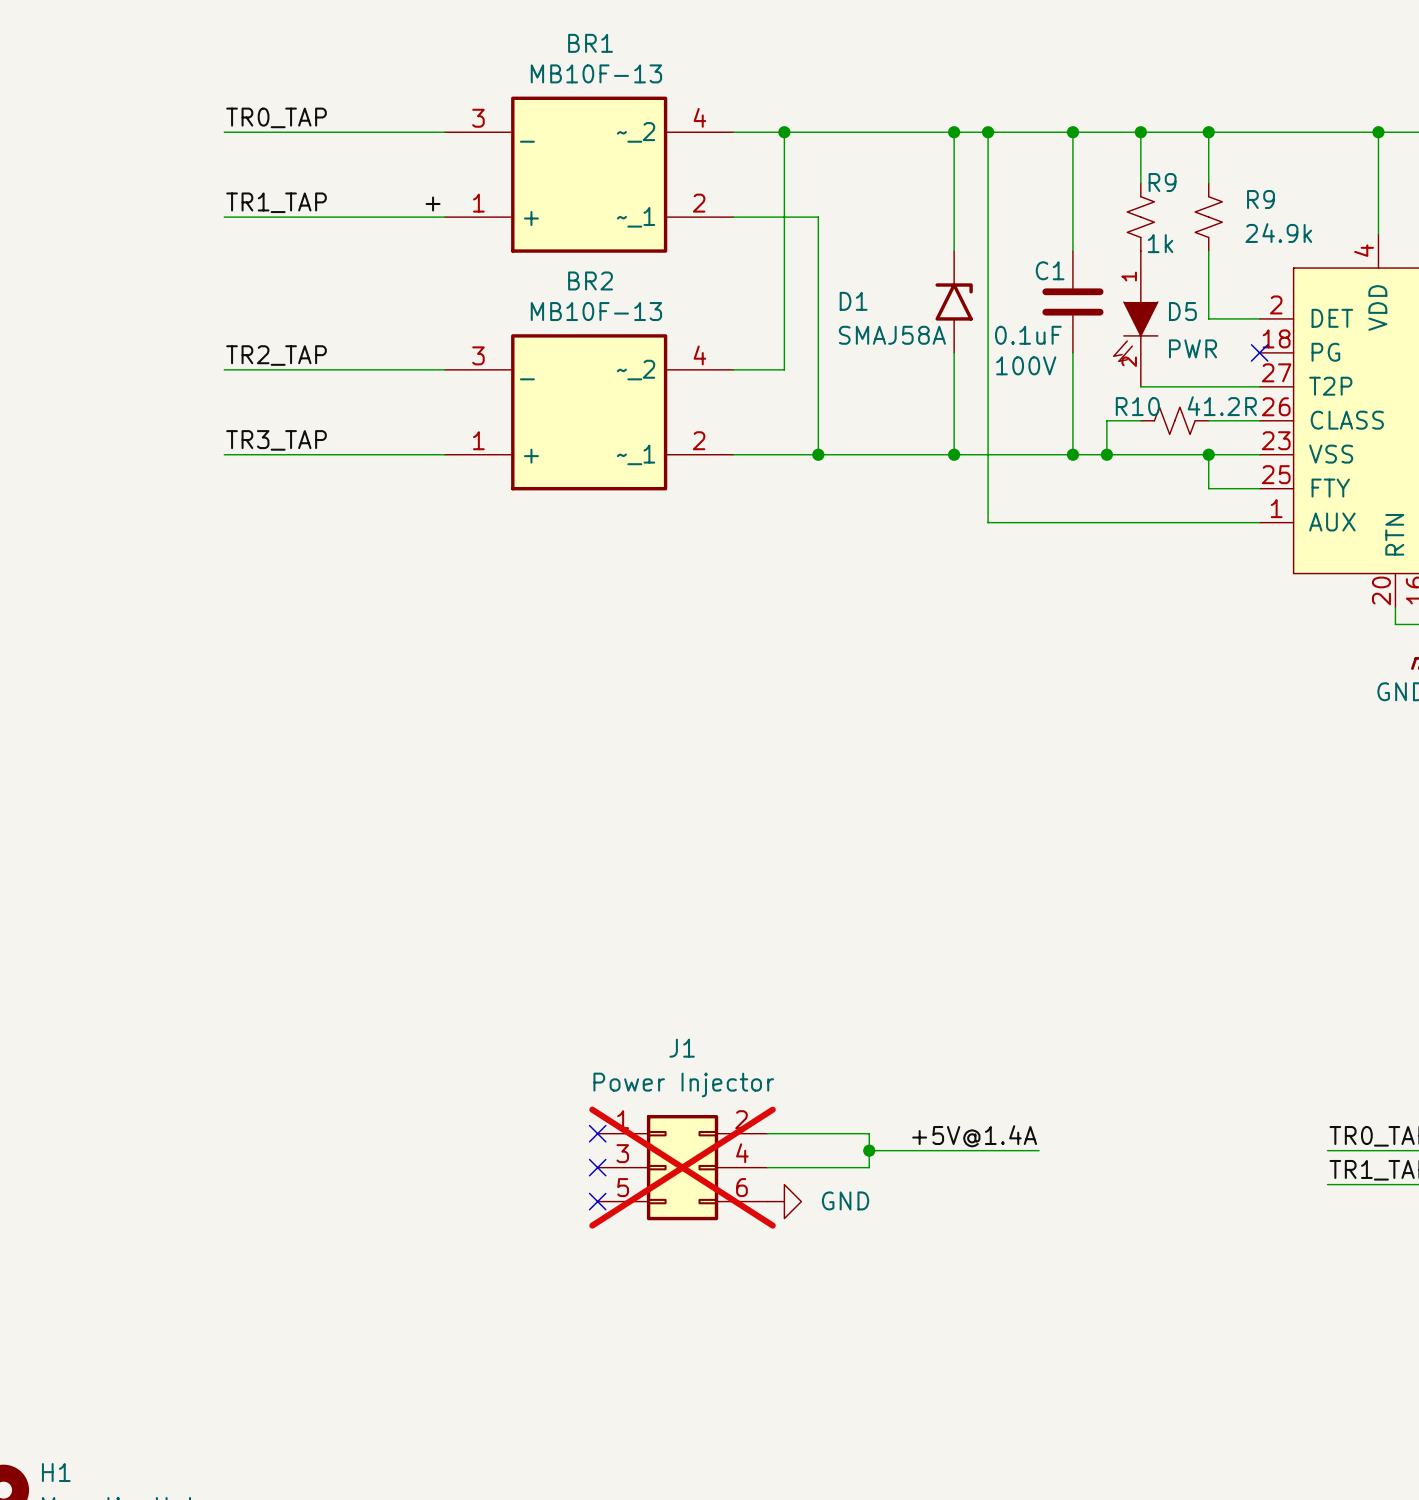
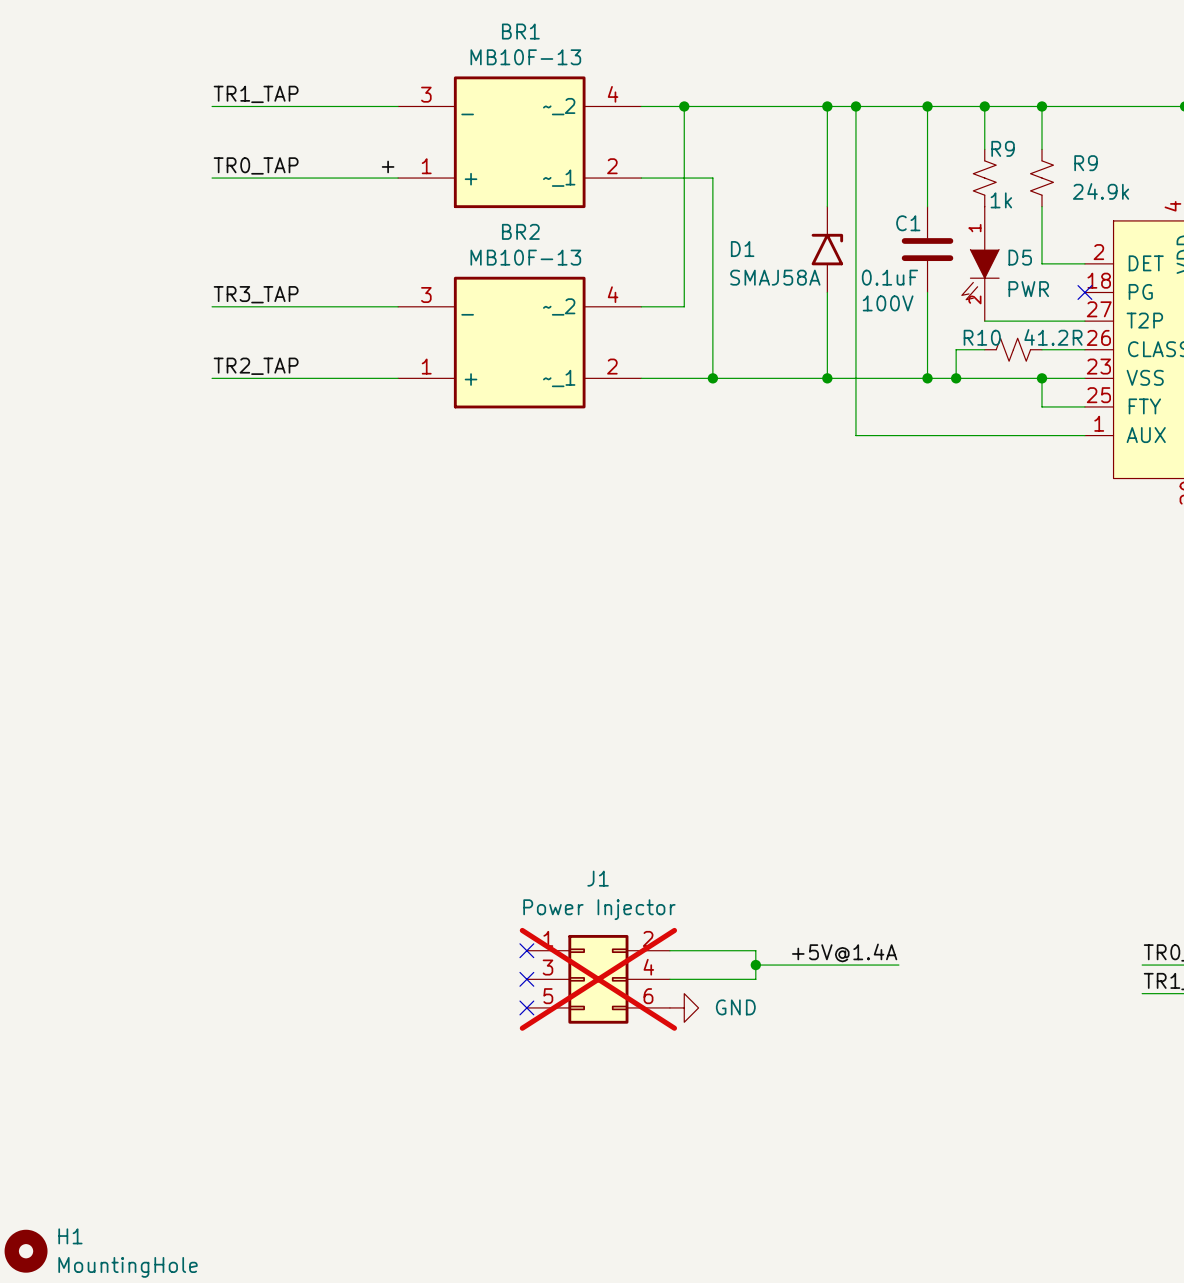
label: TR0_TAP (276, 117) -> TR1_TAP (256, 94)
label: TR1_TAP (276, 202) -> TR0_TAP (256, 165)
label: TR2_TAP (276, 355) -> TR3_TAP (256, 294)
label: TR3_TAP (276, 440) -> TR2_TAP (256, 366)

